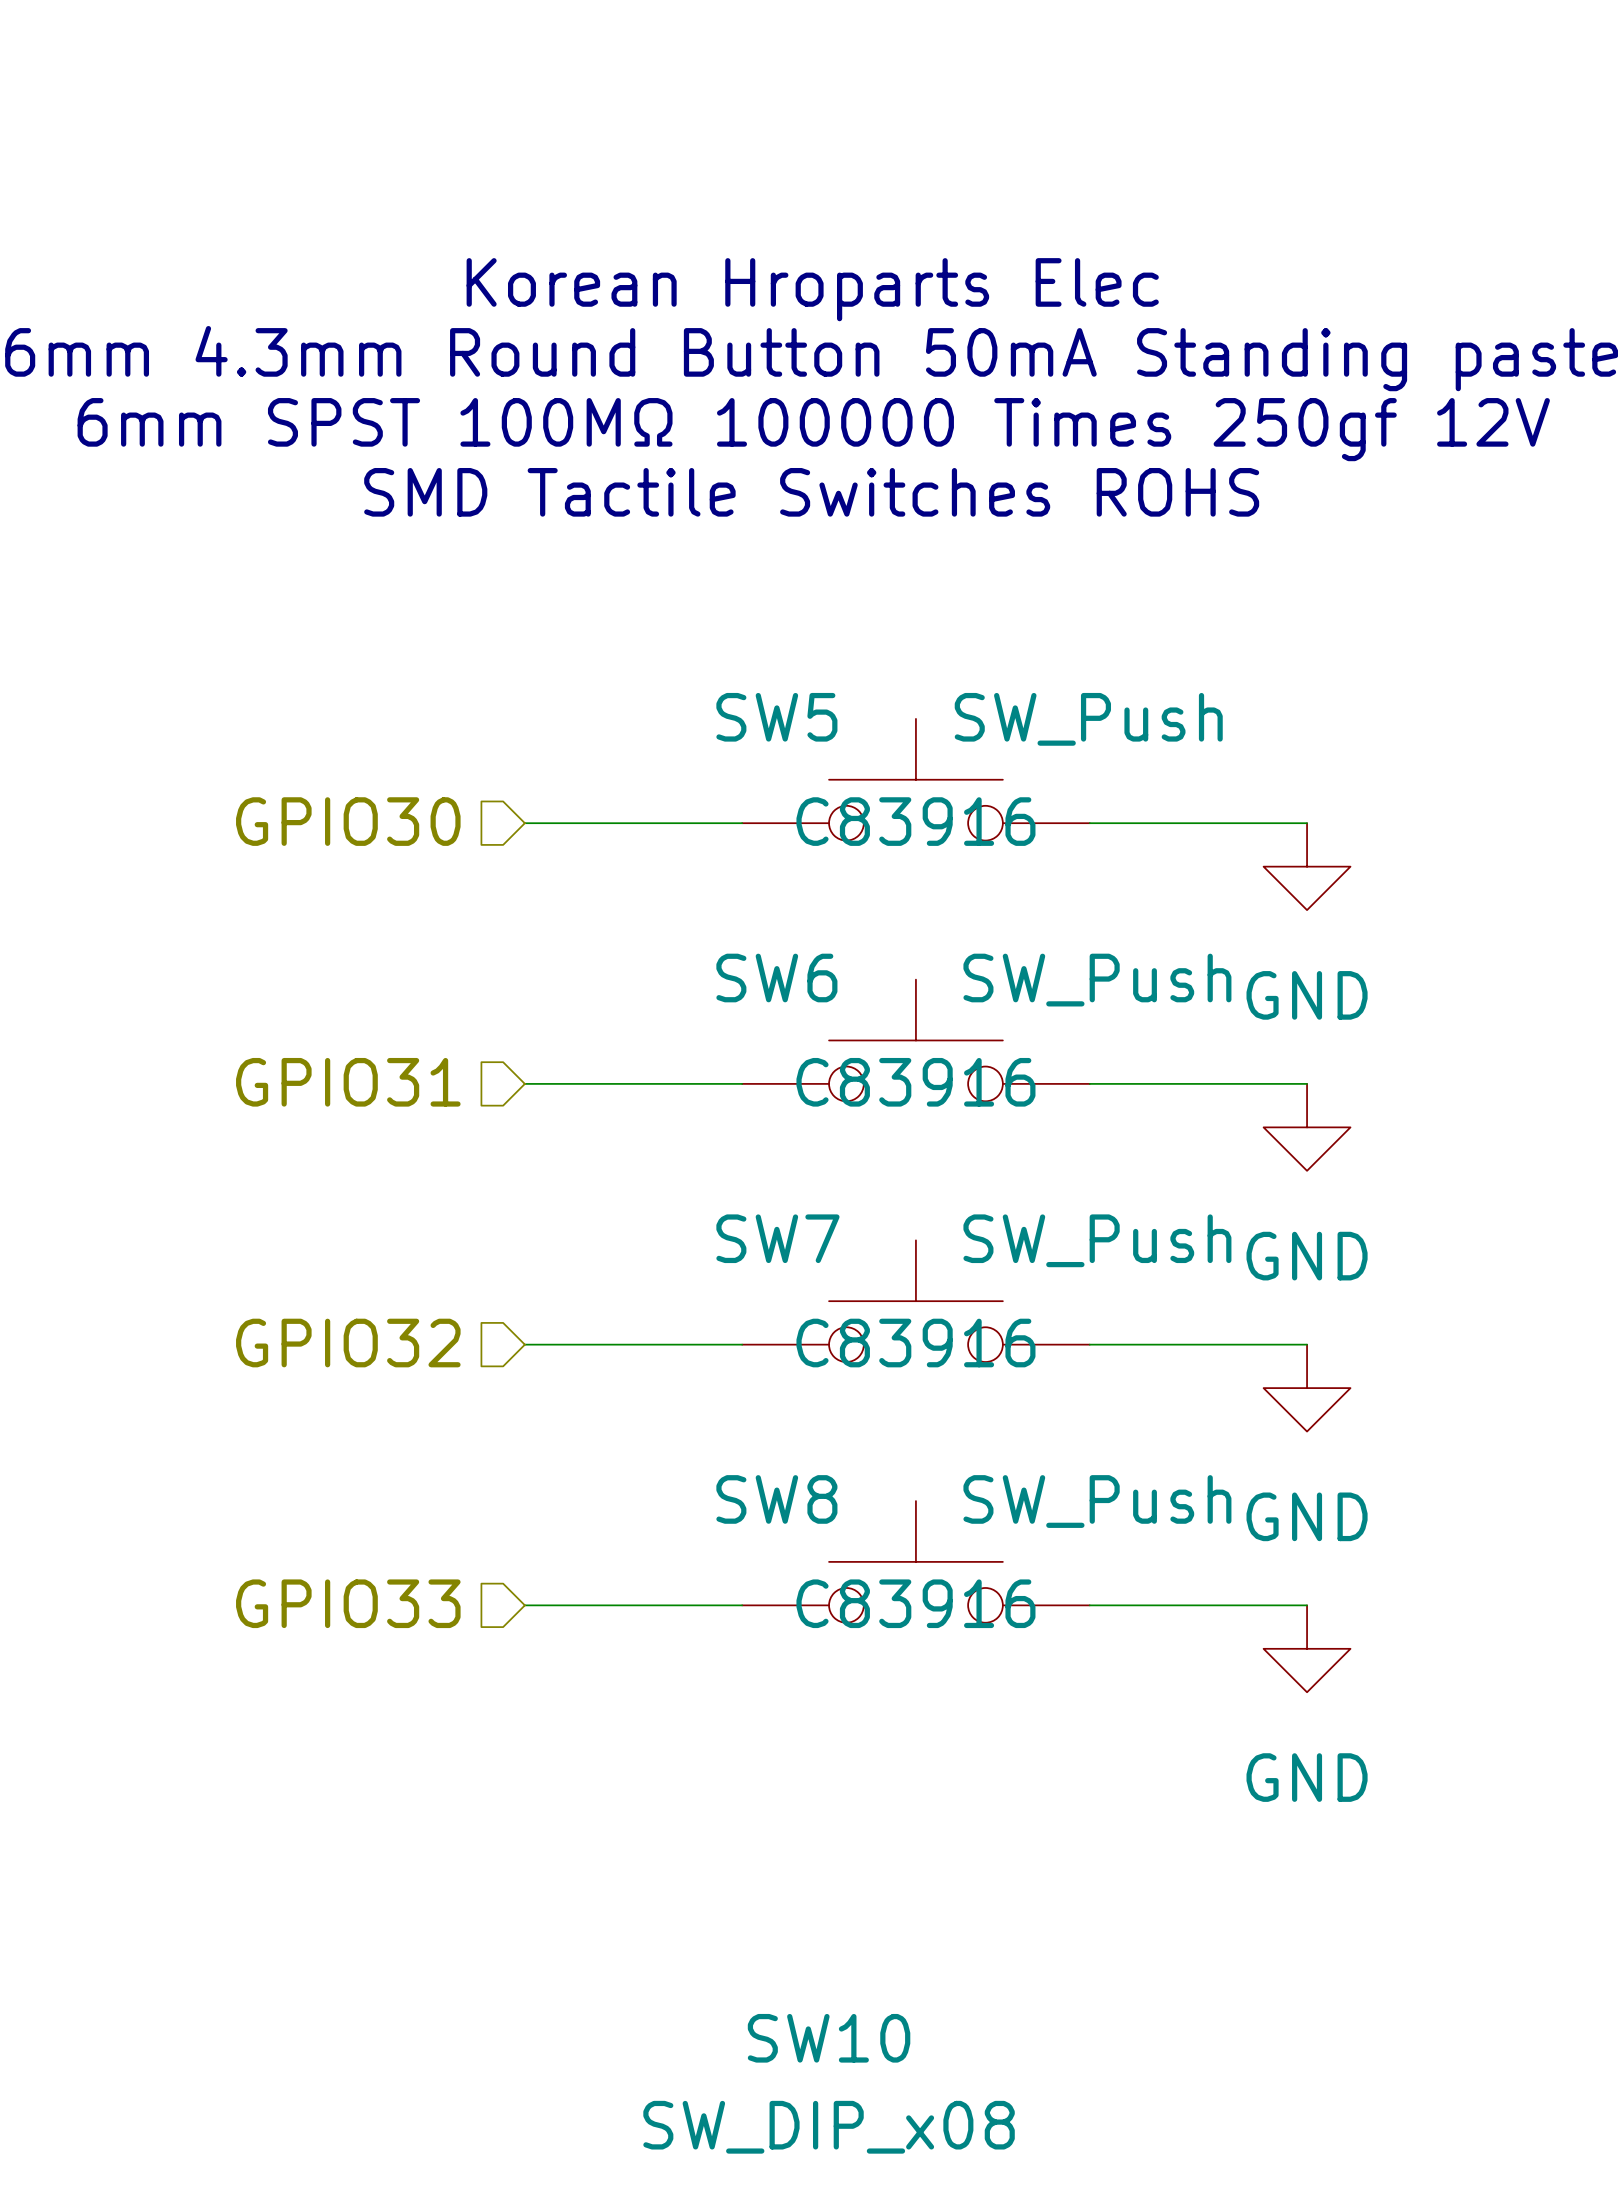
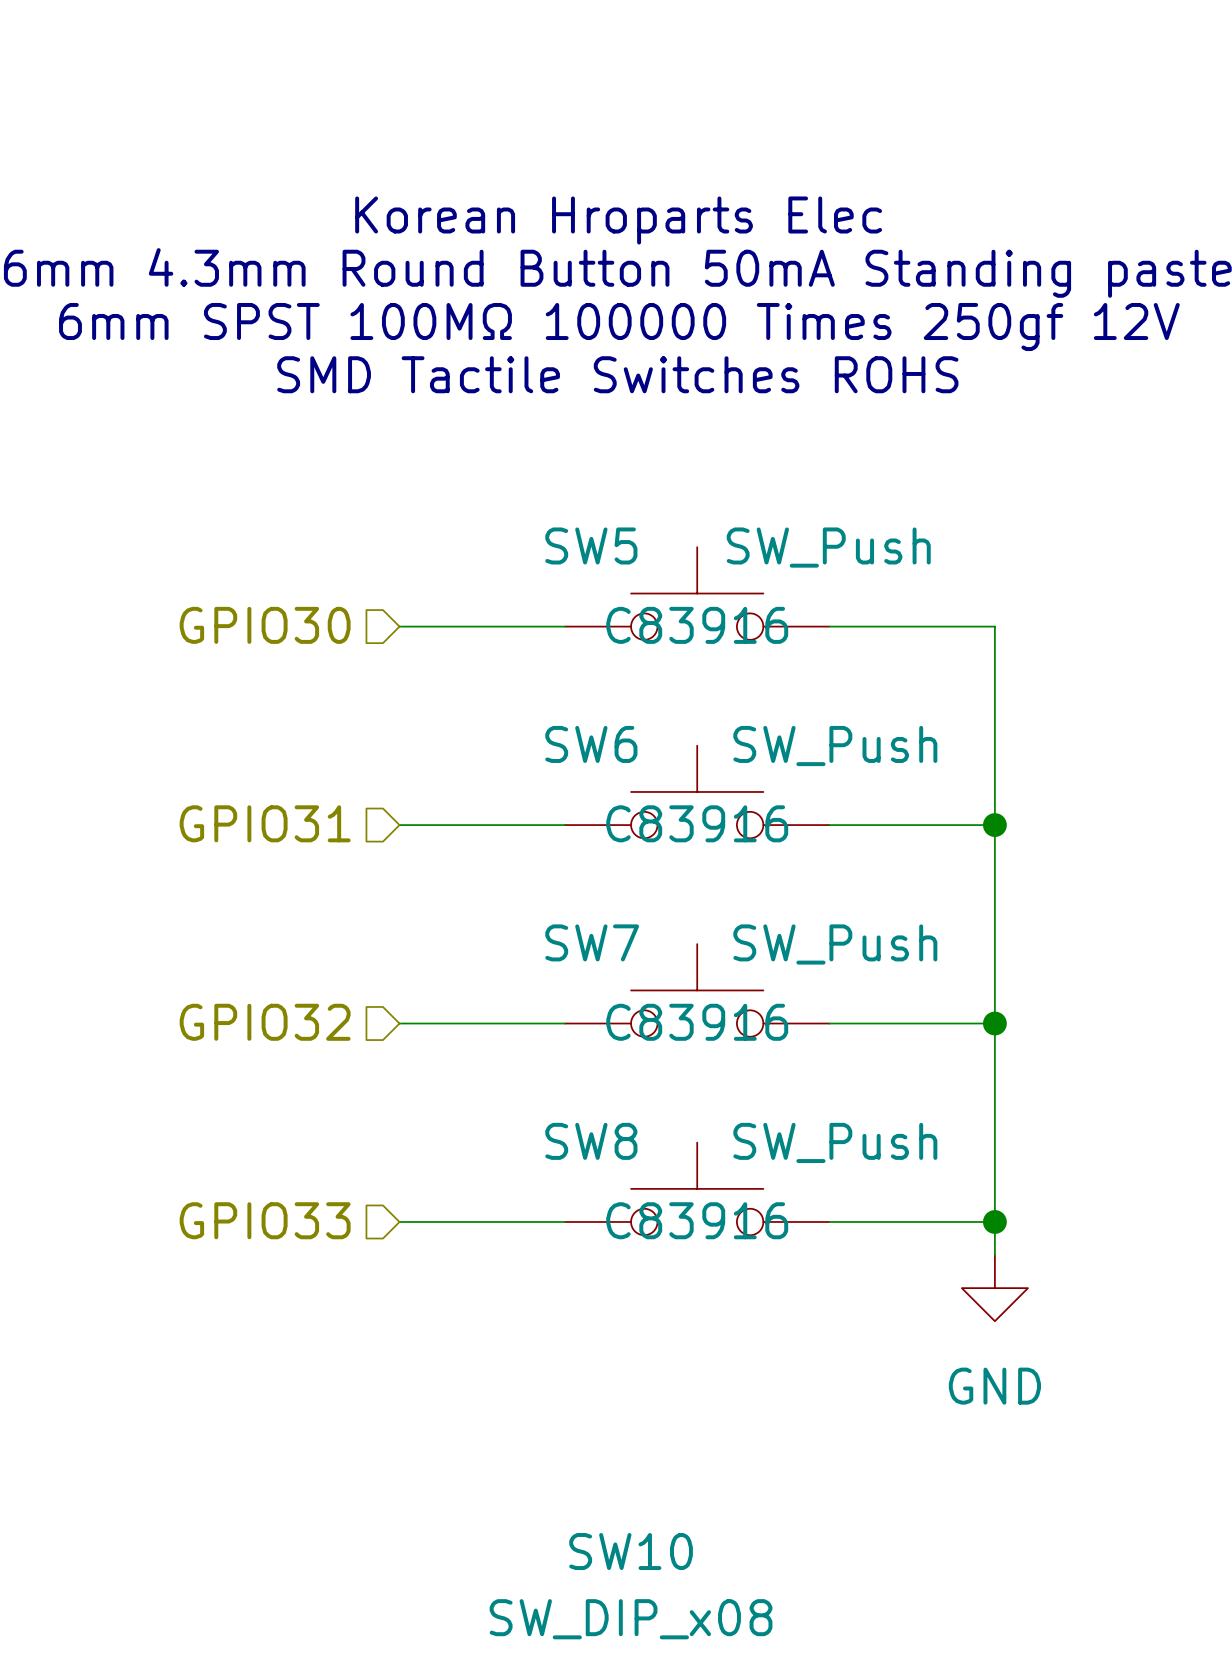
wire: none -> (994, 626) (994, 1255)
power symbol: GND (1307, 866) -> none
junction: none -> (994, 825)
power symbol: GND (1307, 1127) -> none
junction: none -> (994, 1023)
power symbol: GND (1307, 1388) -> none
junction: none -> (994, 1221)
power symbol position: GND (1307, 1648) -> GND (994, 1288)

